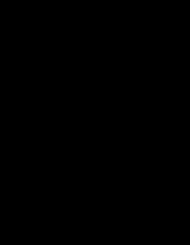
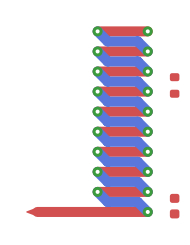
part: none -> (174, 85)
part: none -> (89, 121)
part: none -> (174, 206)

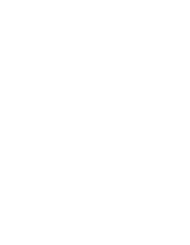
part: (174, 85) -> none
part: (89, 121) -> none
part: (174, 206) -> none

